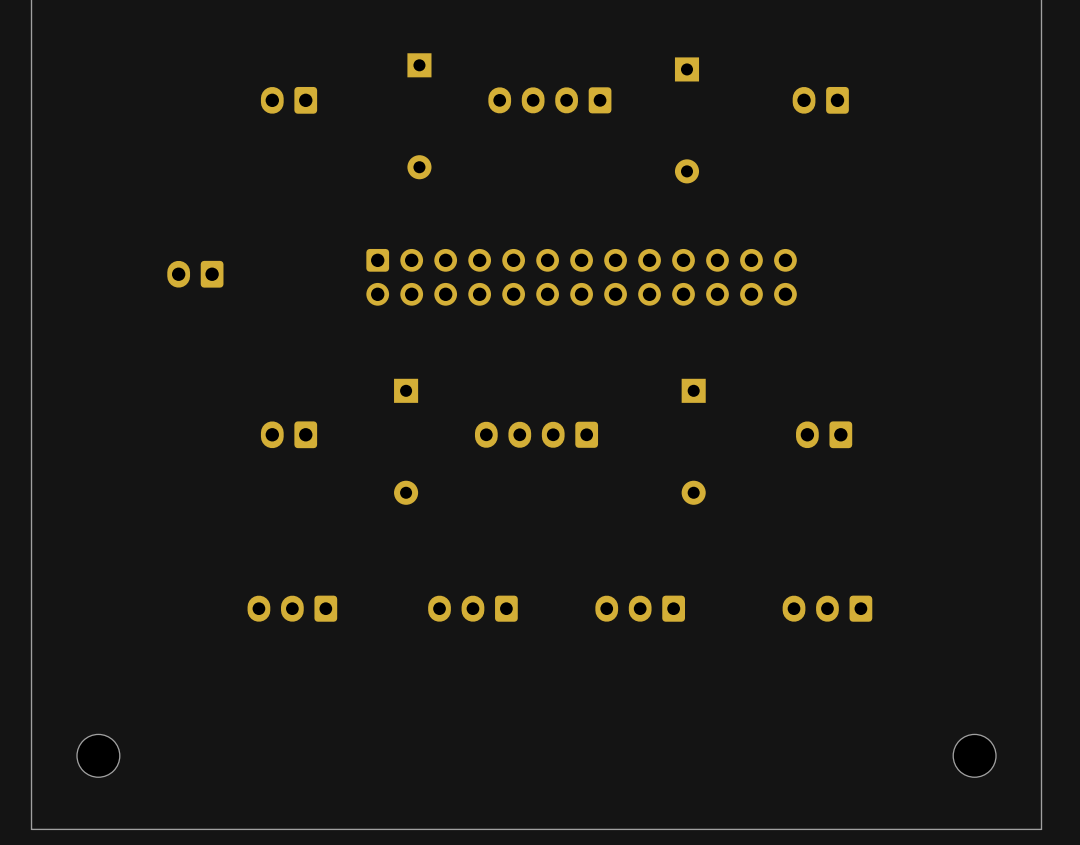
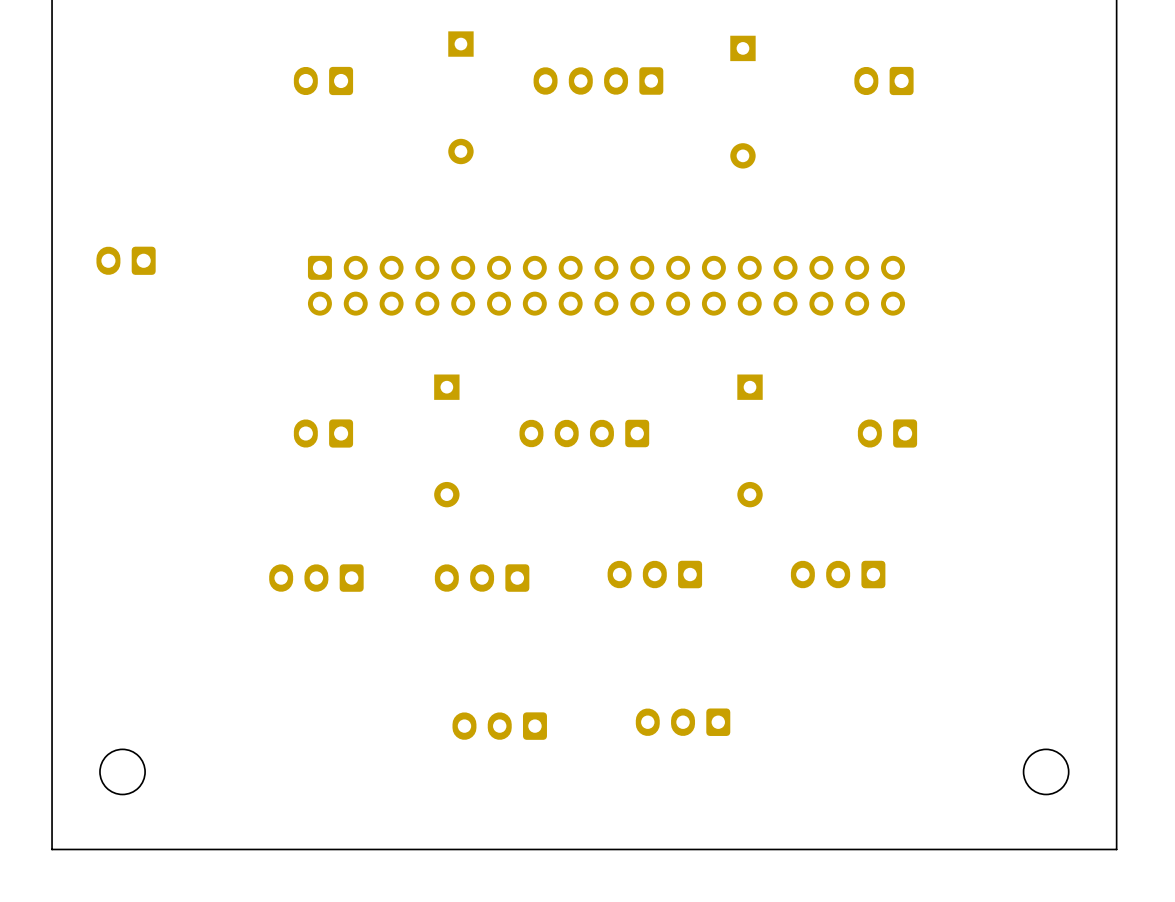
part position: (195, 274) -> (126, 260)
part: (581, 277) -> none
part: none -> (606, 285)
part: none -> (654, 574)
part position: (292, 608) -> (316, 578)
part position: (472, 608) -> (482, 578)
part: (640, 608) -> none
part position: (827, 608) -> (838, 574)
part: none -> (683, 722)
part: none -> (499, 726)

